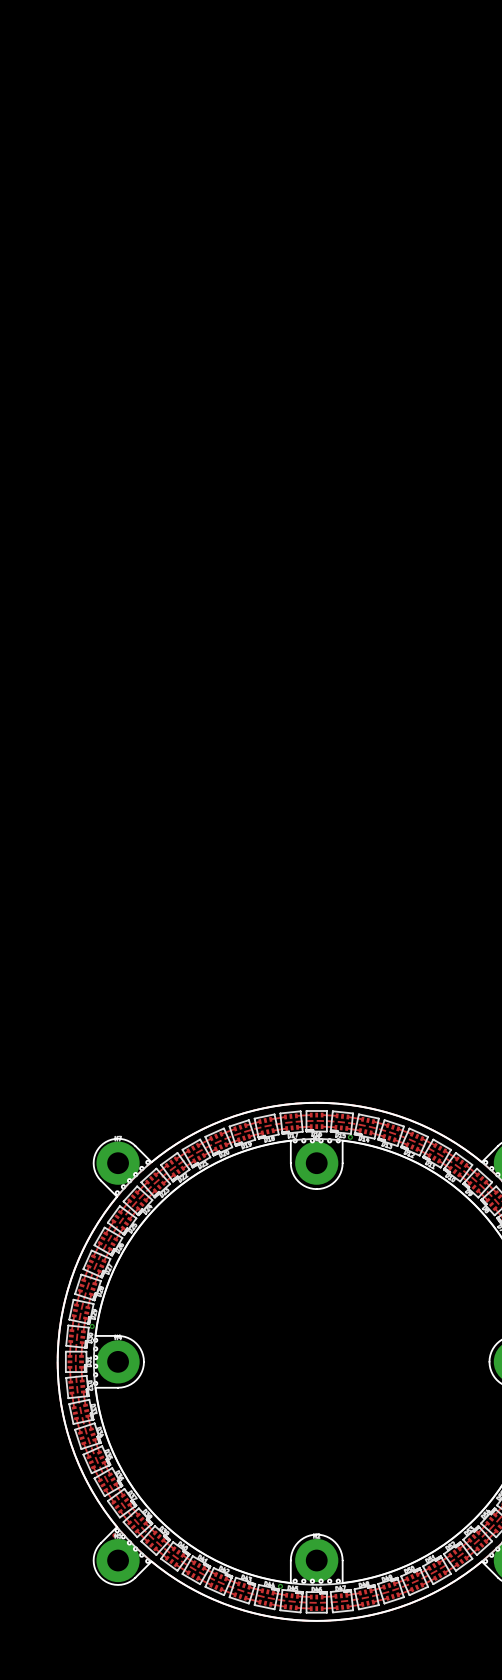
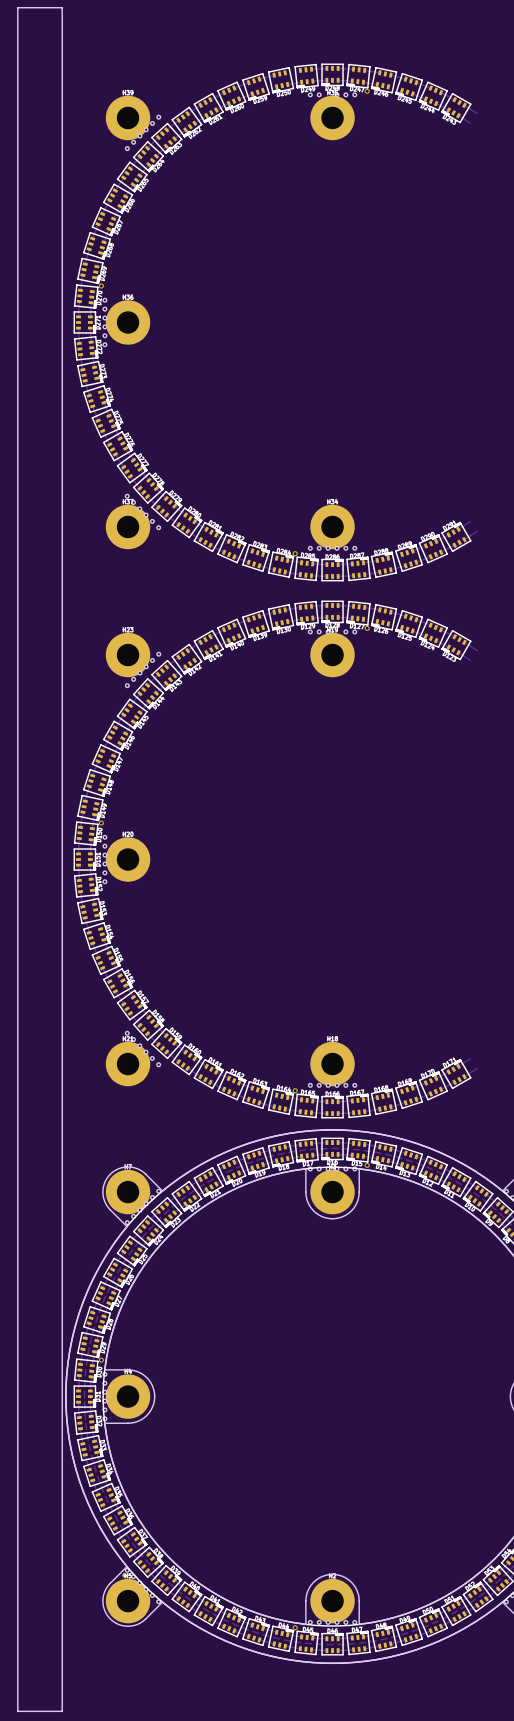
board edge: none -> (17, 7) (17, 1711) (62, 1711) (62, 7) (17, 7)
track: none -> (326, 68) (311, 69)
track: none -> (338, 68) (353, 69)
track: none -> (364, 70) (379, 72)
part: none -> (332, 74)
track: none -> (274, 75) (259, 79)
track: none -> (390, 75) (405, 79)
part: none -> (306, 76)
part: none -> (358, 76)
part: none -> (281, 80)
track: none -> (326, 80) (312, 81)
track: none -> (338, 80) (352, 81)
part: none -> (384, 80)
track: none -> (248, 82) (234, 88)
track: none -> (301, 82) (287, 84)
track: none -> (363, 82) (377, 84)
track: none -> (416, 82) (430, 88)
part: none -> (256, 87)
part: none -> (409, 86)
via: none -> (367, 91)
track: none -> (224, 92) (210, 99)
track: none -> (441, 92) (454, 99)
track: none -> (252, 93) (239, 98)
track: none -> (412, 93) (425, 99)
hole: none -> (310, 94)
hole: none -> (319, 94)
hole: none -> (336, 94)
hole: none -> (345, 94)
hole: none -> (354, 94)
part: none -> (231, 96)
part: none -> (433, 96)
track: none -> (228, 103) (216, 110)
track: none -> (436, 103) (448, 110)
track: none -> (200, 105) (187, 113)
track: none -> (464, 105) (477, 113)
part: none -> (208, 108)
part: none -> (456, 108)
track: none -> (206, 115) (194, 123)
track: none -> (458, 115) (470, 123)
part: none -> (128, 117)
hole: none -> (158, 117)
part: none -> (332, 117)
track: none -> (178, 120) (166, 129)
part: none -> (186, 122)
hole: none -> (152, 123)
hole: none -> (146, 129)
track: none -> (185, 129) (174, 138)
hole: none -> (139, 136)
track: none -> (158, 137) (147, 148)
part: none -> (166, 138)
hole: none -> (133, 142)
track: none -> (166, 146) (156, 156)
hole: none -> (127, 148)
track: none -> (140, 156) (130, 168)
part: none -> (148, 156)
track: none -> (148, 164) (139, 175)
track: none -> (123, 177) (115, 190)
part: none -> (132, 176)
track: none -> (133, 184) (125, 196)
part: none -> (118, 198)
track: none -> (109, 200) (102, 214)
track: none -> (120, 206) (113, 218)
part: none -> (106, 221)
track: none -> (98, 224) (92, 238)
track: none -> (109, 229) (104, 242)
part: none -> (97, 245)
track: none -> (89, 249) (85, 264)
part: none -> (90, 270)
track: none -> (82, 275) (80, 290)
via: none -> (101, 286)
part: none -> (86, 296)
hole: none -> (104, 300)
track: none -> (79, 301) (78, 316)
track: none -> (91, 302) (90, 316)
hole: none -> (104, 309)
hole: none -> (104, 318)
part: none -> (84, 322)
part: none -> (128, 322)
hole: none -> (104, 326)
track: none -> (78, 328) (79, 343)
track: none -> (90, 328) (91, 342)
hole: none -> (104, 335)
hole: none -> (104, 344)
part: none -> (86, 348)
track: none -> (92, 353) (94, 367)
track: none -> (80, 354) (82, 369)
part: none -> (90, 373)
track: none -> (85, 380) (89, 395)
part: none -> (97, 399)
track: none -> (104, 402) (109, 415)
track: none -> (92, 406) (98, 420)
part: none -> (106, 423)
track: none -> (113, 426) (120, 438)
track: none -> (102, 430) (109, 444)
part: none -> (118, 446)
track: none -> (125, 448) (133, 460)
track: none -> (115, 454) (123, 467)
part: none -> (132, 468)
track: none -> (139, 469) (148, 480)
track: none -> (130, 476) (140, 488)
part: none -> (148, 488)
track: none -> (156, 488) (166, 498)
hole: none -> (127, 496)
track: none -> (147, 496) (158, 507)
hole: none -> (133, 502)
track: none -> (174, 506) (185, 515)
part: none -> (166, 506)
hole: none -> (139, 508)
hole: none -> (146, 515)
track: none -> (166, 514) (178, 524)
hole: none -> (152, 521)
track: none -> (194, 521) (206, 529)
track: none -> (470, 521) (458, 529)
part: none -> (186, 522)
part: none -> (128, 526)
hole: none -> (158, 527)
part: none -> (332, 526)
track: none -> (187, 531) (200, 539)
track: none -> (477, 531) (464, 539)
track: none -> (216, 534) (228, 541)
track: none -> (448, 534) (436, 541)
part: none -> (208, 536)
part: none -> (456, 536)
track: none -> (210, 545) (224, 552)
track: none -> (454, 545) (441, 552)
track: none -> (425, 545) (412, 550)
hole: none -> (310, 548)
hole: none -> (319, 548)
hole: none -> (328, 548)
hole: none -> (336, 548)
hole: none -> (345, 548)
hole: none -> (354, 548)
part: none -> (231, 548)
part: none -> (433, 548)
via: none -> (295, 553)
track: none -> (234, 556) (248, 562)
track: none -> (430, 556) (416, 562)
part: none -> (256, 557)
part: none -> (409, 557)
track: none -> (287, 560) (301, 562)
track: none -> (377, 560) (363, 562)
track: none -> (352, 563) (338, 564)
part: none -> (281, 564)
track: none -> (312, 563) (326, 564)
part: none -> (383, 564)
track: none -> (259, 565) (274, 569)
track: none -> (405, 565) (390, 569)
part: none -> (306, 568)
part: none -> (358, 568)
part: none -> (332, 570)
track: none -> (285, 572) (300, 574)
track: none -> (379, 572) (364, 574)
track: none -> (311, 575) (326, 576)
track: none -> (353, 575) (338, 576)
track: none -> (326, 605) (311, 606)
track: none -> (338, 605) (353, 606)
track: none -> (300, 607) (285, 609)
track: none -> (364, 607) (379, 609)
track: none -> (274, 612) (259, 616)
part: none -> (332, 611)
track: none -> (390, 612) (405, 616)
part: none -> (306, 613)
part: none -> (358, 613)
part: none -> (281, 617)
track: none -> (326, 617) (312, 618)
track: none -> (338, 617) (352, 618)
part: none -> (384, 617)
track: none -> (301, 619) (287, 621)
track: none -> (248, 619) (234, 625)
track: none -> (416, 619) (430, 625)
part: none -> (256, 624)
part: none -> (409, 624)
via: none -> (367, 628)
track: none -> (224, 629) (210, 636)
track: none -> (441, 629) (454, 636)
track: none -> (412, 631) (425, 636)
hole: none -> (310, 631)
hole: none -> (319, 631)
hole: none -> (328, 631)
hole: none -> (345, 631)
hole: none -> (354, 631)
part: none -> (231, 633)
part: none -> (433, 633)
track: none -> (228, 640) (216, 647)
track: none -> (436, 640) (448, 647)
track: none -> (200, 642) (187, 650)
track: none -> (464, 642) (477, 650)
part: none -> (208, 645)
part: none -> (456, 645)
track: none -> (458, 652) (470, 660)
hole: none -> (158, 654)
part: none -> (128, 655)
part: none -> (332, 655)
track: none -> (178, 657) (166, 667)
part: none -> (186, 659)
hole: none -> (152, 660)
hole: none -> (146, 666)
track: none -> (185, 666) (174, 675)
hole: none -> (139, 673)
track: none -> (158, 674) (147, 685)
part: none -> (166, 675)
hole: none -> (133, 679)
track: none -> (166, 683) (156, 693)
hole: none -> (127, 685)
track: none -> (140, 693) (130, 705)
part: none -> (148, 693)
track: none -> (148, 701) (139, 712)
part: none -> (132, 714)
track: none -> (123, 714) (115, 727)
track: none -> (133, 721) (125, 733)
part: none -> (118, 735)
track: none -> (109, 737) (102, 751)
track: none -> (120, 743) (113, 755)
part: none -> (106, 758)
track: none -> (98, 761) (92, 775)
part: none -> (97, 782)
track: none -> (89, 786) (85, 801)
part: none -> (90, 808)
track: none -> (82, 812) (80, 827)
track: none -> (94, 814) (92, 828)
via: none -> (101, 823)
part: none -> (86, 833)
hole: none -> (104, 837)
track: none -> (79, 838) (78, 853)
track: none -> (91, 839) (90, 853)
hole: none -> (104, 846)
hole: none -> (104, 855)
part: none -> (84, 859)
part: none -> (128, 859)
hole: none -> (104, 863)
track: none -> (78, 865) (79, 880)
track: none -> (90, 865) (91, 879)
hole: none -> (104, 872)
hole: none -> (104, 881)
part: none -> (86, 885)
track: none -> (92, 890) (94, 904)
track: none -> (80, 891) (82, 906)
part: none -> (90, 911)
track: none -> (85, 917) (89, 932)
part: none -> (97, 936)
track: none -> (104, 939) (109, 952)
track: none -> (92, 943) (98, 957)
part: none -> (106, 960)
track: none -> (113, 963) (120, 975)
track: none -> (102, 968) (109, 981)
part: none -> (118, 983)
track: none -> (125, 985) (133, 997)
track: none -> (115, 991) (123, 1004)
part: none -> (132, 1005)
track: none -> (139, 1006) (148, 1017)
track: none -> (130, 1013) (140, 1025)
part: none -> (148, 1025)
track: none -> (156, 1025) (166, 1035)
hole: none -> (127, 1033)
track: none -> (147, 1033) (158, 1044)
hole: none -> (133, 1039)
part: none -> (166, 1043)
track: none -> (174, 1043) (185, 1052)
hole: none -> (139, 1045)
hole: none -> (146, 1052)
track: none -> (166, 1052) (178, 1061)
hole: none -> (152, 1058)
track: none -> (194, 1058) (206, 1066)
track: none -> (470, 1058) (458, 1066)
part: none -> (186, 1059)
part: none -> (128, 1064)
part: none -> (332, 1064)
hole: none -> (158, 1064)
track: none -> (187, 1068) (200, 1076)
track: none -> (477, 1068) (464, 1076)
track: none -> (216, 1072) (228, 1078)
track: none -> (448, 1072) (436, 1078)
part: none -> (208, 1074)
part: none -> (456, 1073)
track: none -> (210, 1082) (224, 1089)
track: none -> (454, 1082) (441, 1089)
track: none -> (239, 1083) (252, 1088)
track: none -> (425, 1083) (412, 1088)
part: none -> (231, 1085)
hole: none -> (310, 1085)
hole: none -> (319, 1085)
hole: none -> (328, 1085)
hole: none -> (336, 1085)
hole: none -> (345, 1085)
hole: none -> (354, 1085)
part: none -> (433, 1085)
via: none -> (295, 1090)
track: none -> (234, 1093) (248, 1099)
track: none -> (430, 1093) (416, 1099)
part: none -> (256, 1095)
part: none -> (409, 1095)
track: none -> (287, 1097) (301, 1099)
track: none -> (377, 1097) (363, 1099)
track: none -> (312, 1100) (326, 1101)
track: none -> (352, 1100) (338, 1101)
part: none -> (281, 1101)
part: none -> (383, 1101)
track: none -> (259, 1102) (274, 1106)
track: none -> (405, 1102) (390, 1106)
part: none -> (306, 1105)
part: none -> (358, 1105)
part: none -> (332, 1107)
track: none -> (285, 1109) (300, 1111)
track: none -> (379, 1109) (364, 1111)
track: none -> (311, 1112) (326, 1113)
track: none -> (353, 1112) (338, 1113)

